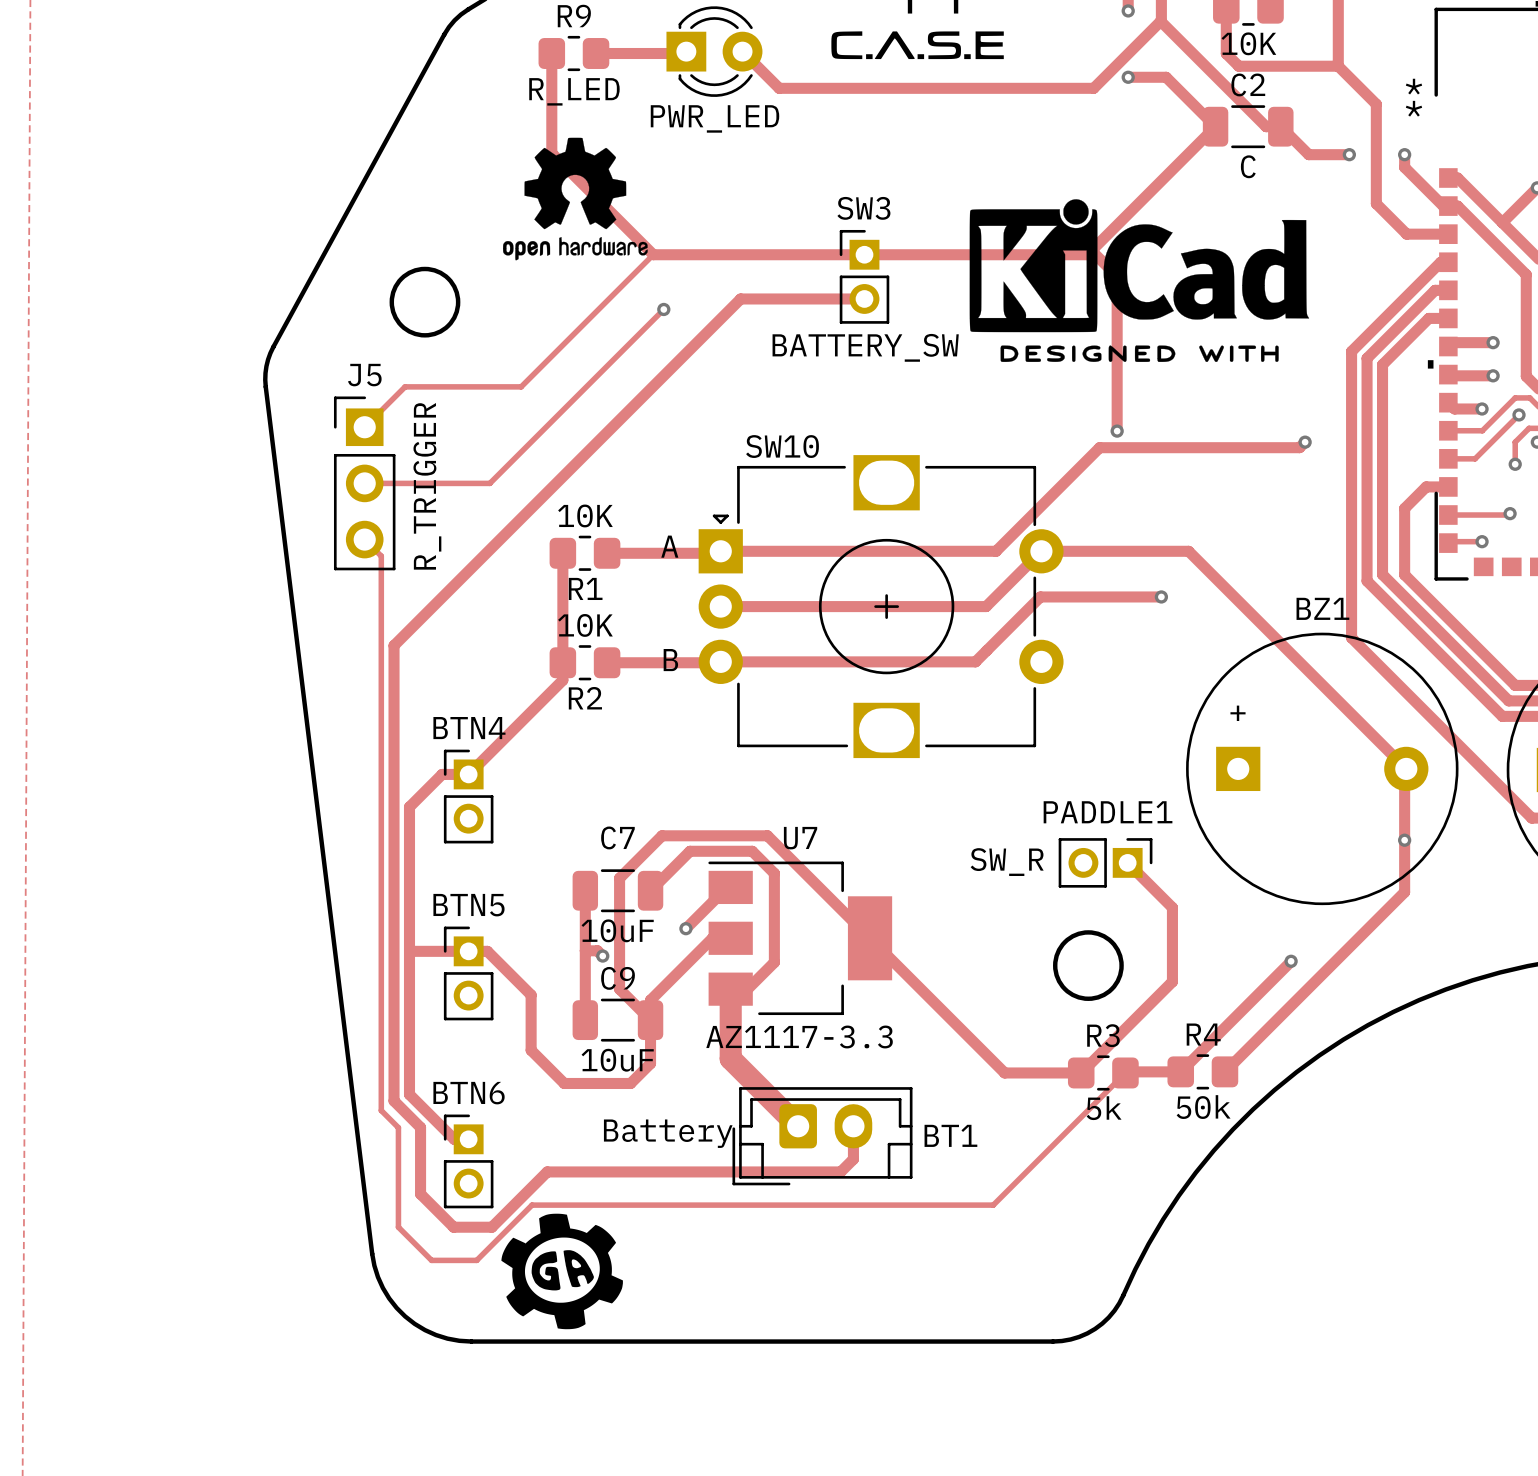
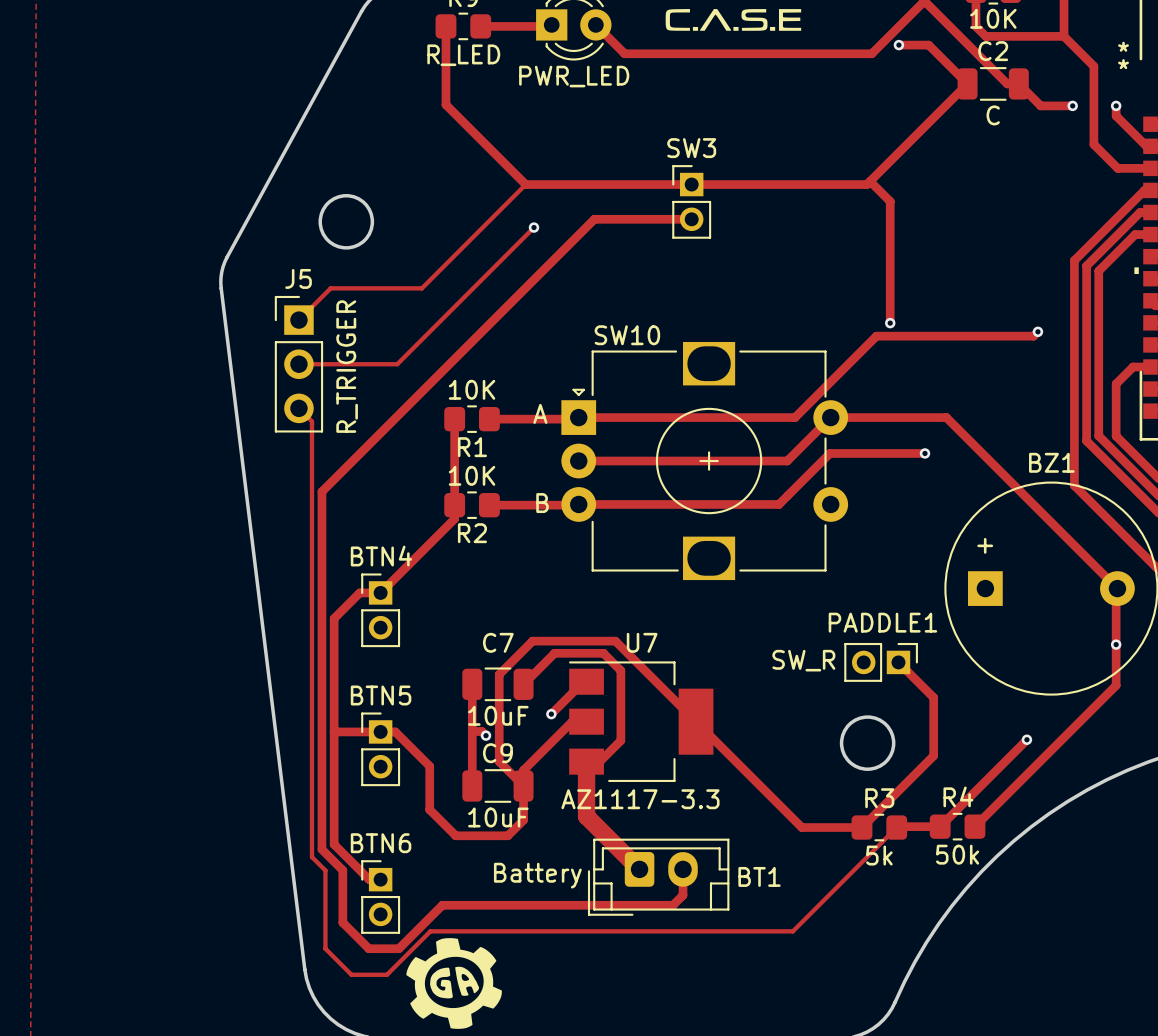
drawing: [503, 137, 648, 261] -> none
drawing: [969, 199, 1310, 362] -> none
SW3 value: BATTERY_SW (865, 347) -> none

